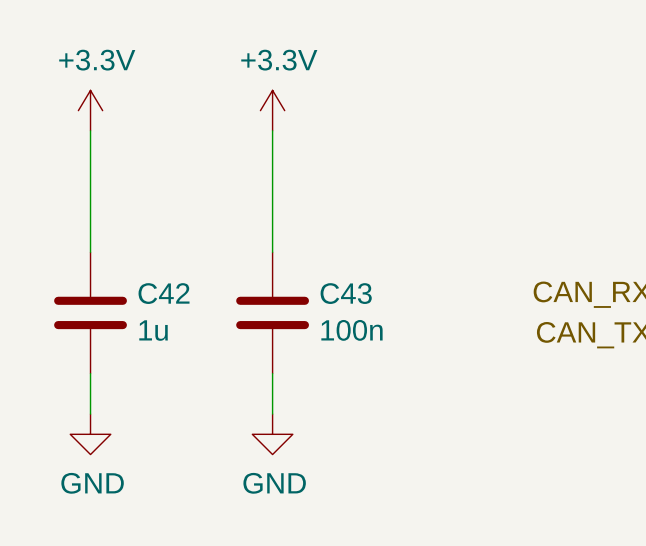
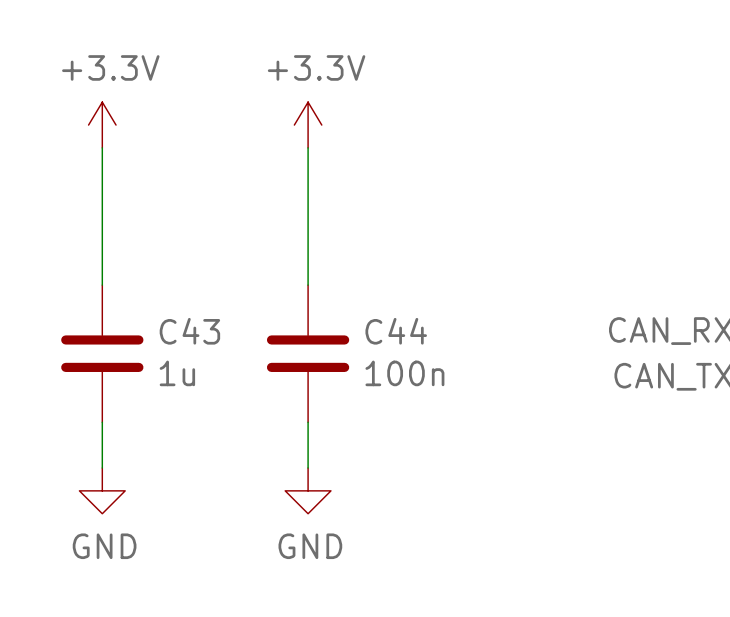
C42 name: C42 (164, 293) -> C43 (189, 331)
C43 name: C43 (346, 293) -> C44 (396, 331)

